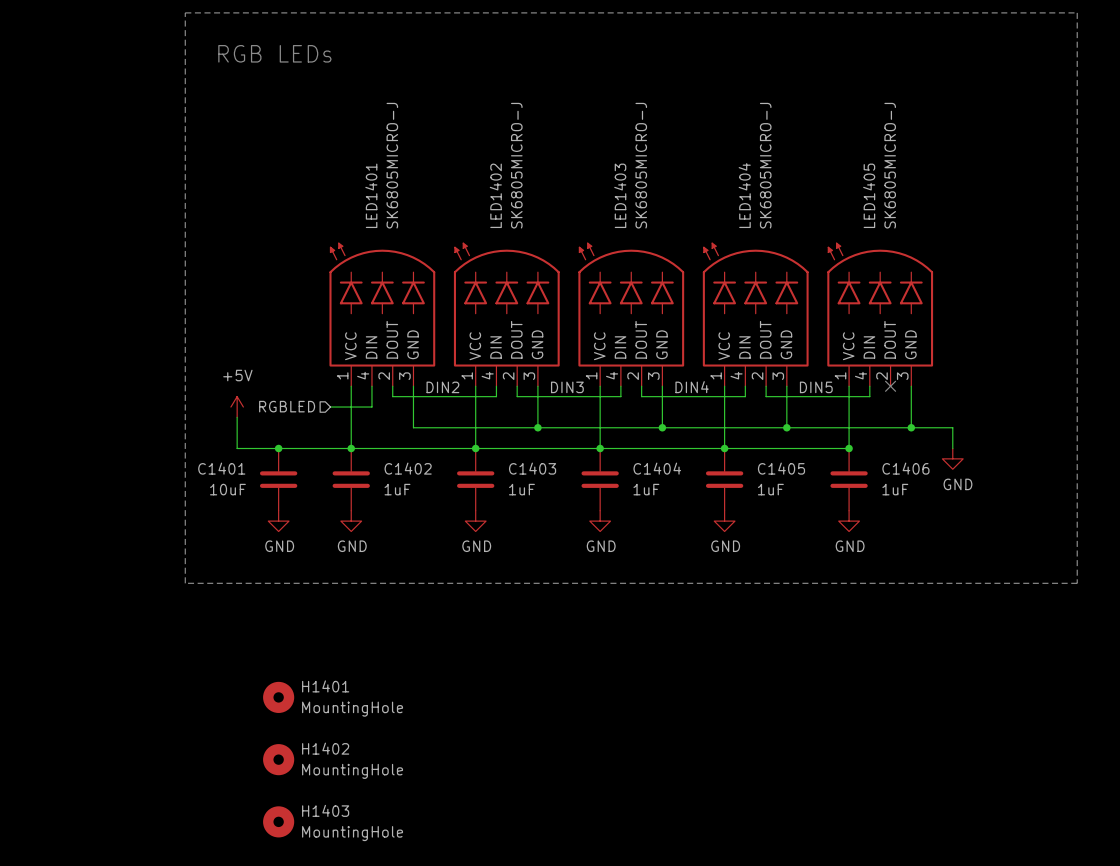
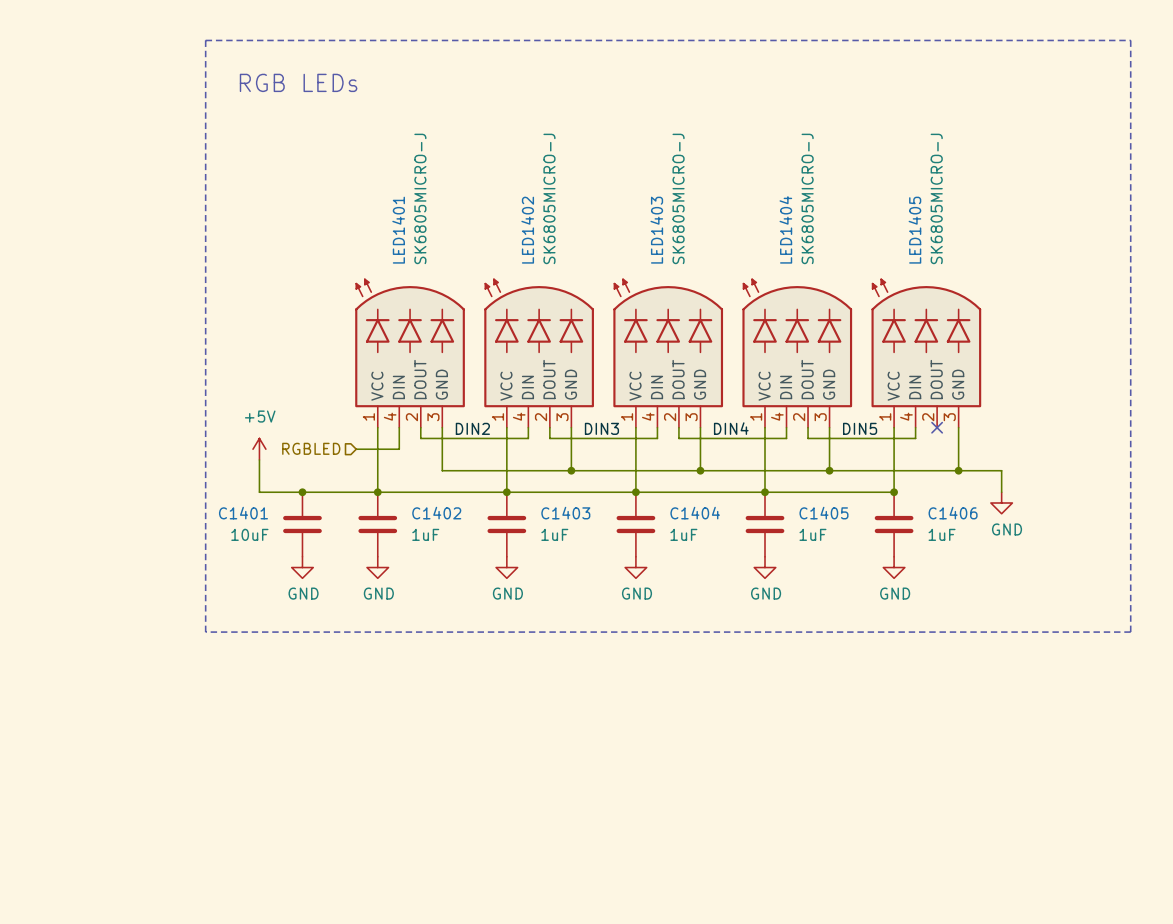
H1401: MountingHole (278, 697) -> none
H1402: MountingHole (278, 759) -> none
H1403: MountingHole (278, 821) -> none

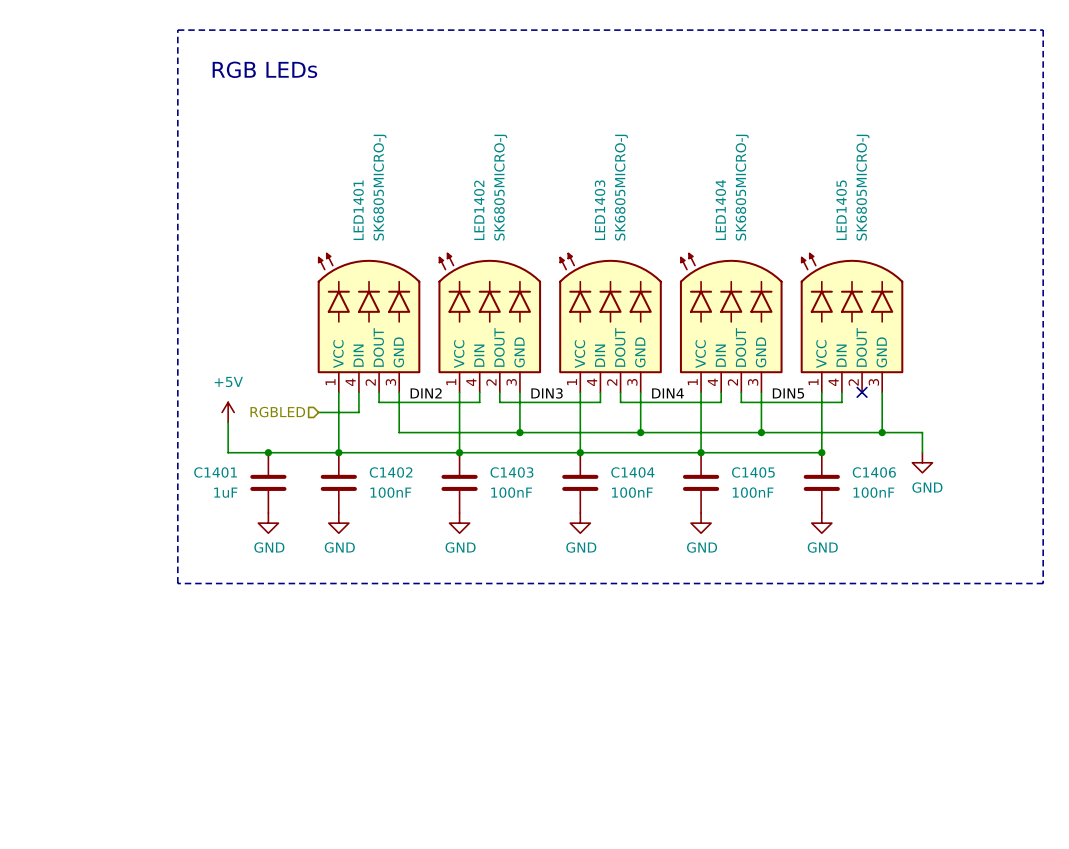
C1401 value: 10uF (249, 534) -> 1uF (225, 492)
C1402 value: 1uF (425, 534) -> 100nF (390, 492)
C1403 value: 1uF (554, 534) -> 100nF (511, 492)
C1404 value: 1uF (683, 534) -> 100nF (632, 492)
C1405 value: 1uF (812, 534) -> 100nF (753, 492)
C1406 value: 1uF (942, 534) -> 100nF (873, 492)

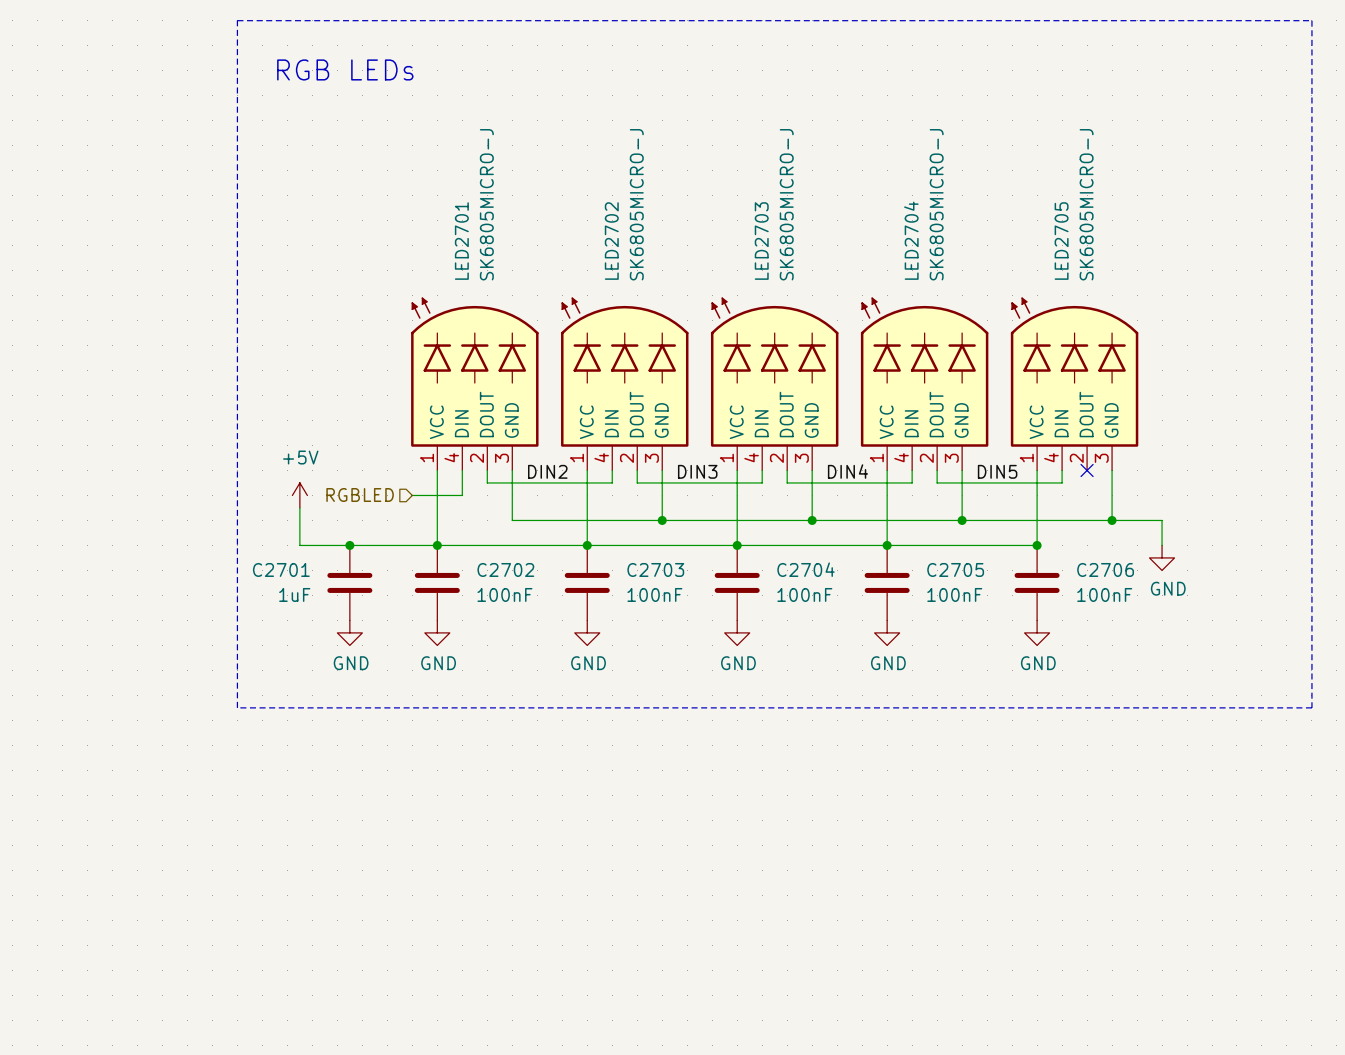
LED1401 name: LED1401 (358, 210) -> LED2701 (461, 241)
LED1402 name: LED1402 (479, 210) -> LED2702 (611, 241)
LED1403 name: LED1403 (600, 210) -> LED2703 (761, 241)
LED1404 name: LED1404 (720, 210) -> LED2704 (911, 240)
LED1405 name: LED1405 (841, 210) -> LED2705 (1061, 241)
C1401 name: C1401 (215, 472) -> C2701 (281, 569)
C1402 name: C1402 (391, 472) -> C2702 (505, 569)
C1403 name: C1403 (511, 472) -> C2703 (655, 569)
C1404 name: C1404 (632, 472) -> C2704 (806, 569)
C1405 name: C1405 (753, 472) -> C2705 (955, 569)
C1406 name: C1406 (874, 472) -> C2706 (1105, 569)

